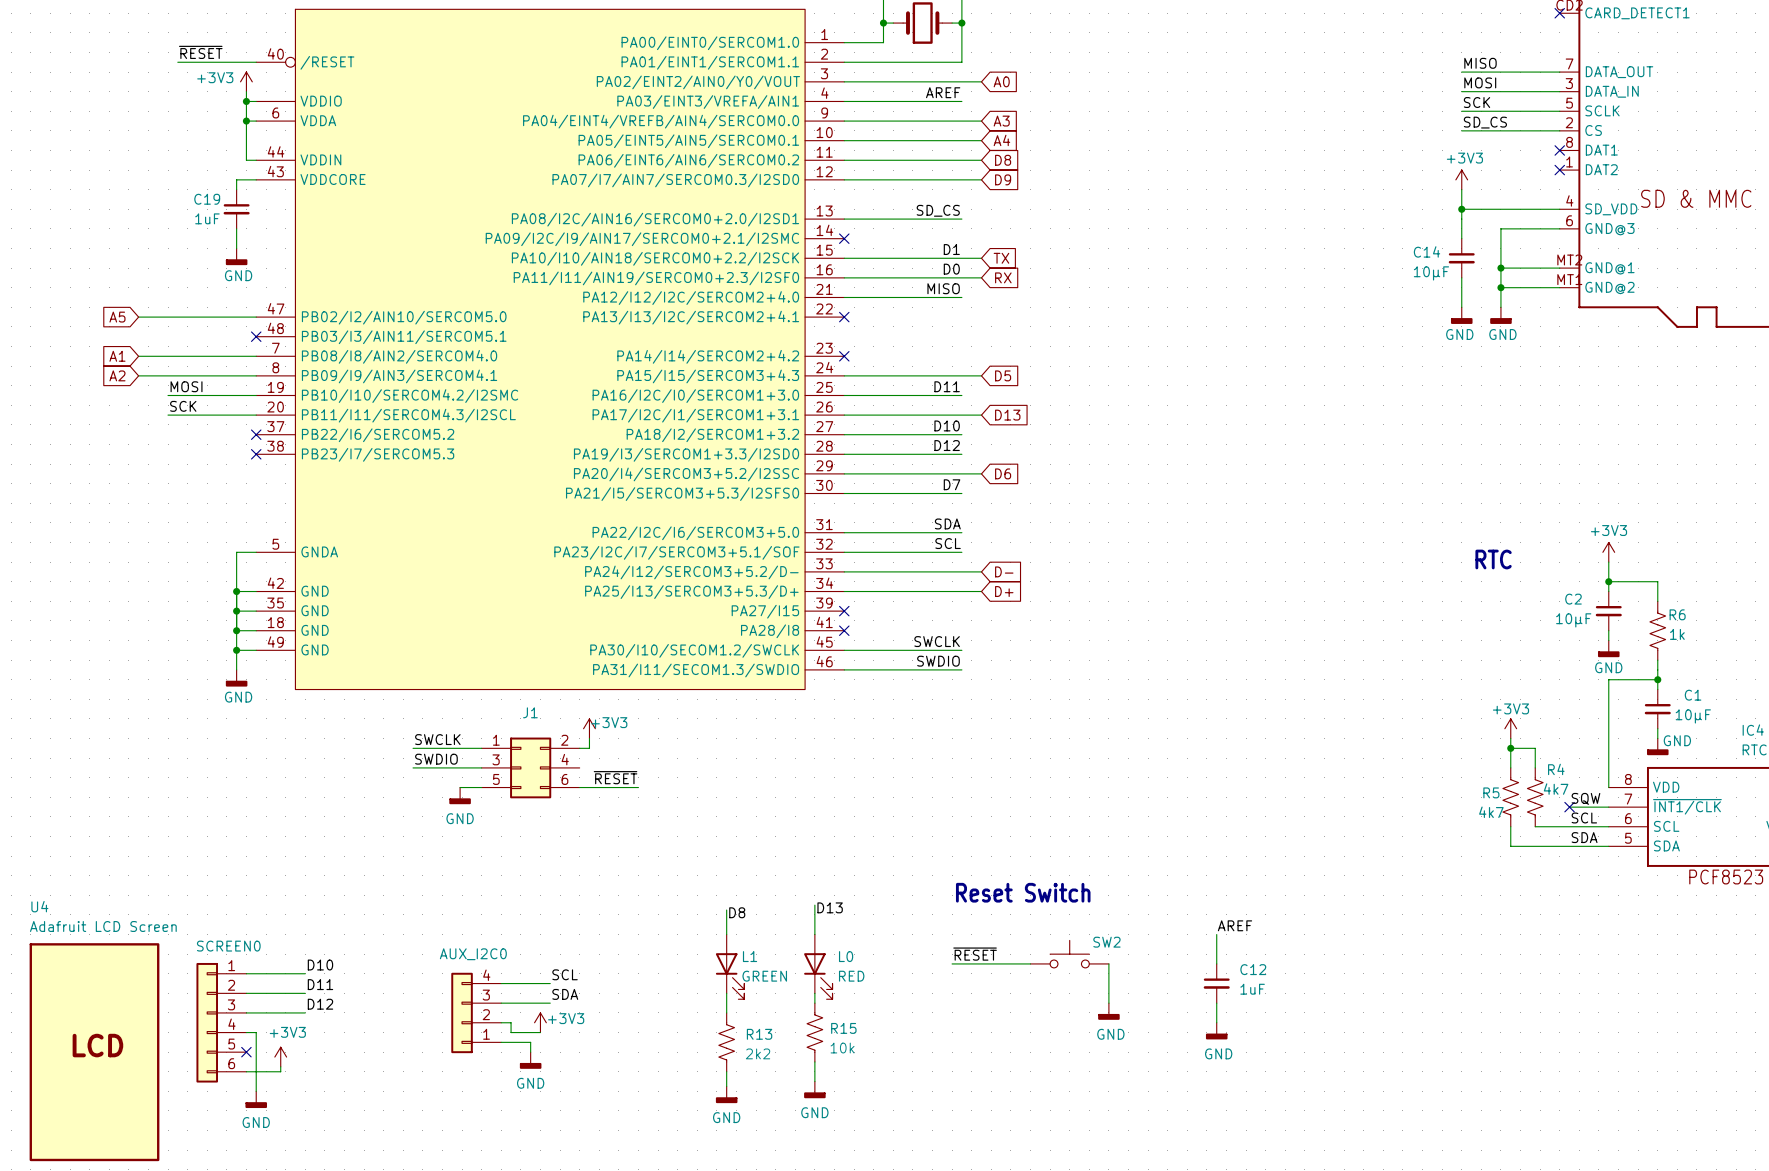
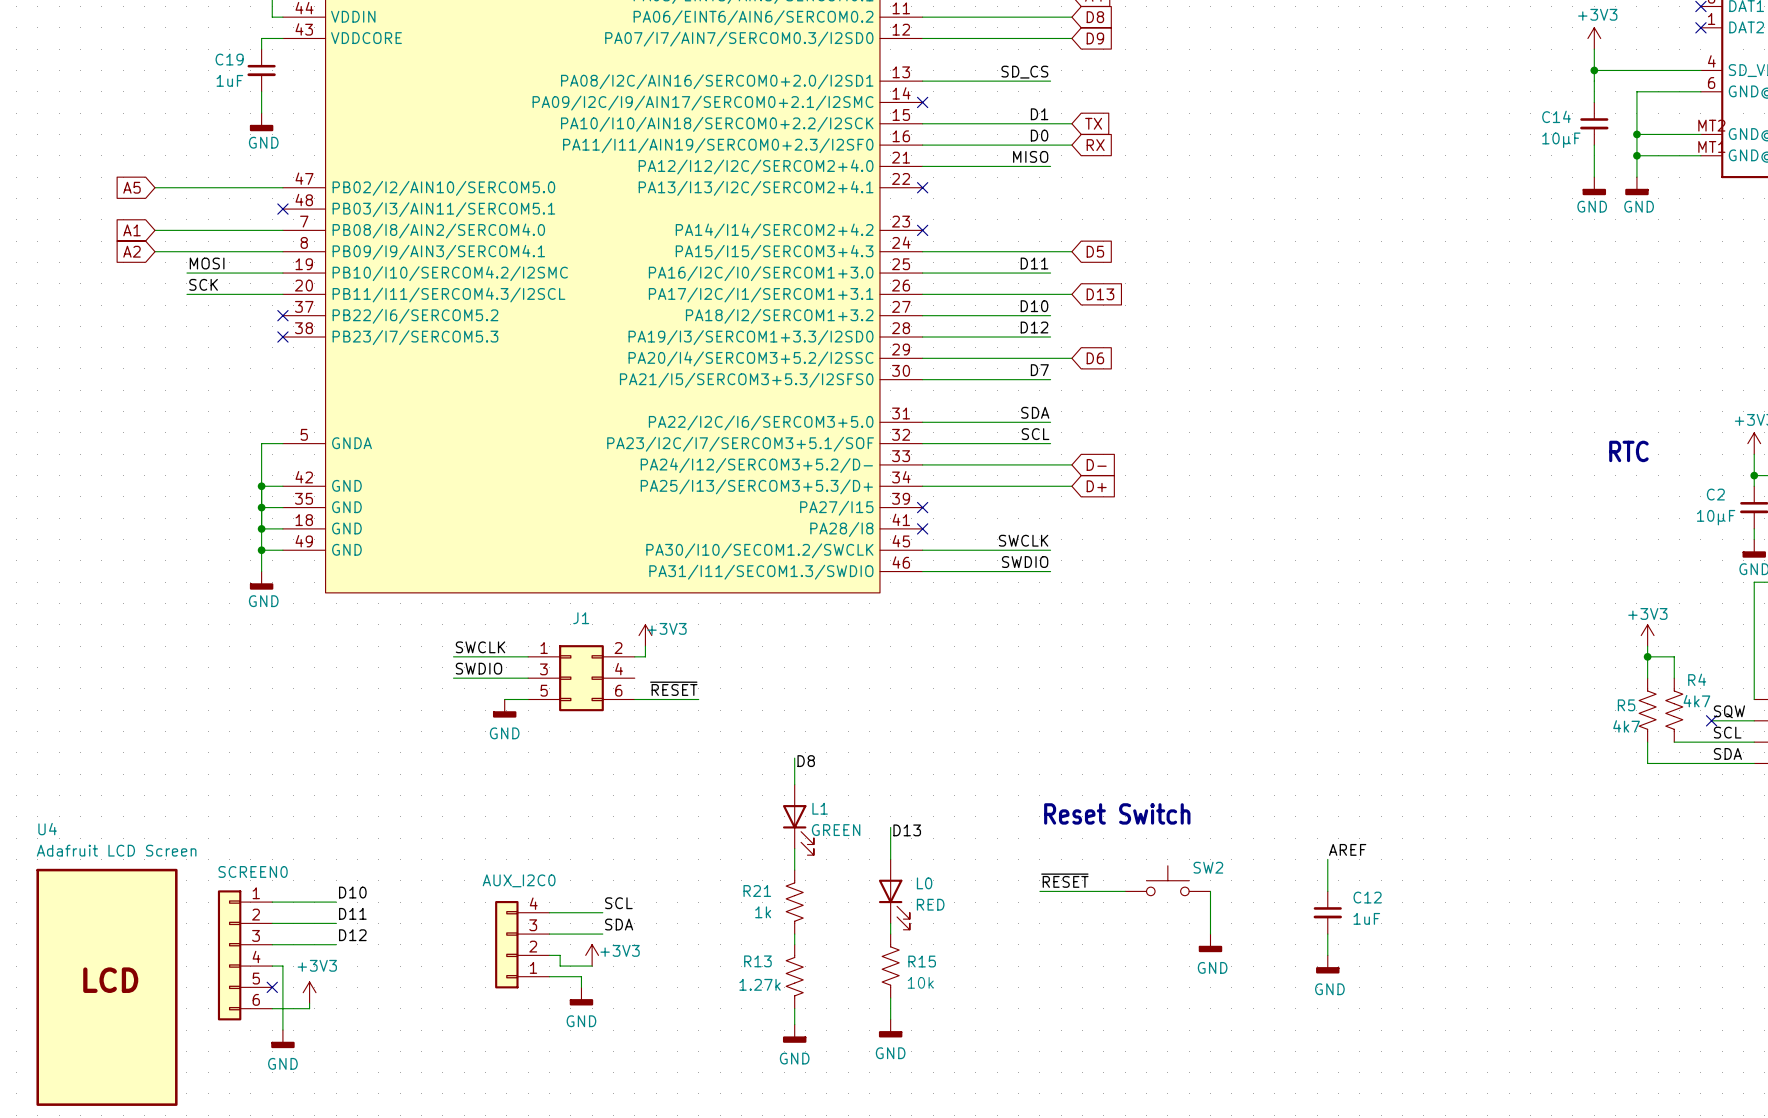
wire: none -> (794, 758) (794, 784)
label position: D8 (737, 912) -> D8 (806, 761)
L1 position: (730, 966) -> (798, 819)
R21: none -> 1k (794, 902)
R13 flip: as is (726, 1042) -> left-right (794, 976)
R13 value: 2k2 (758, 1053) -> 1.27k (760, 984)

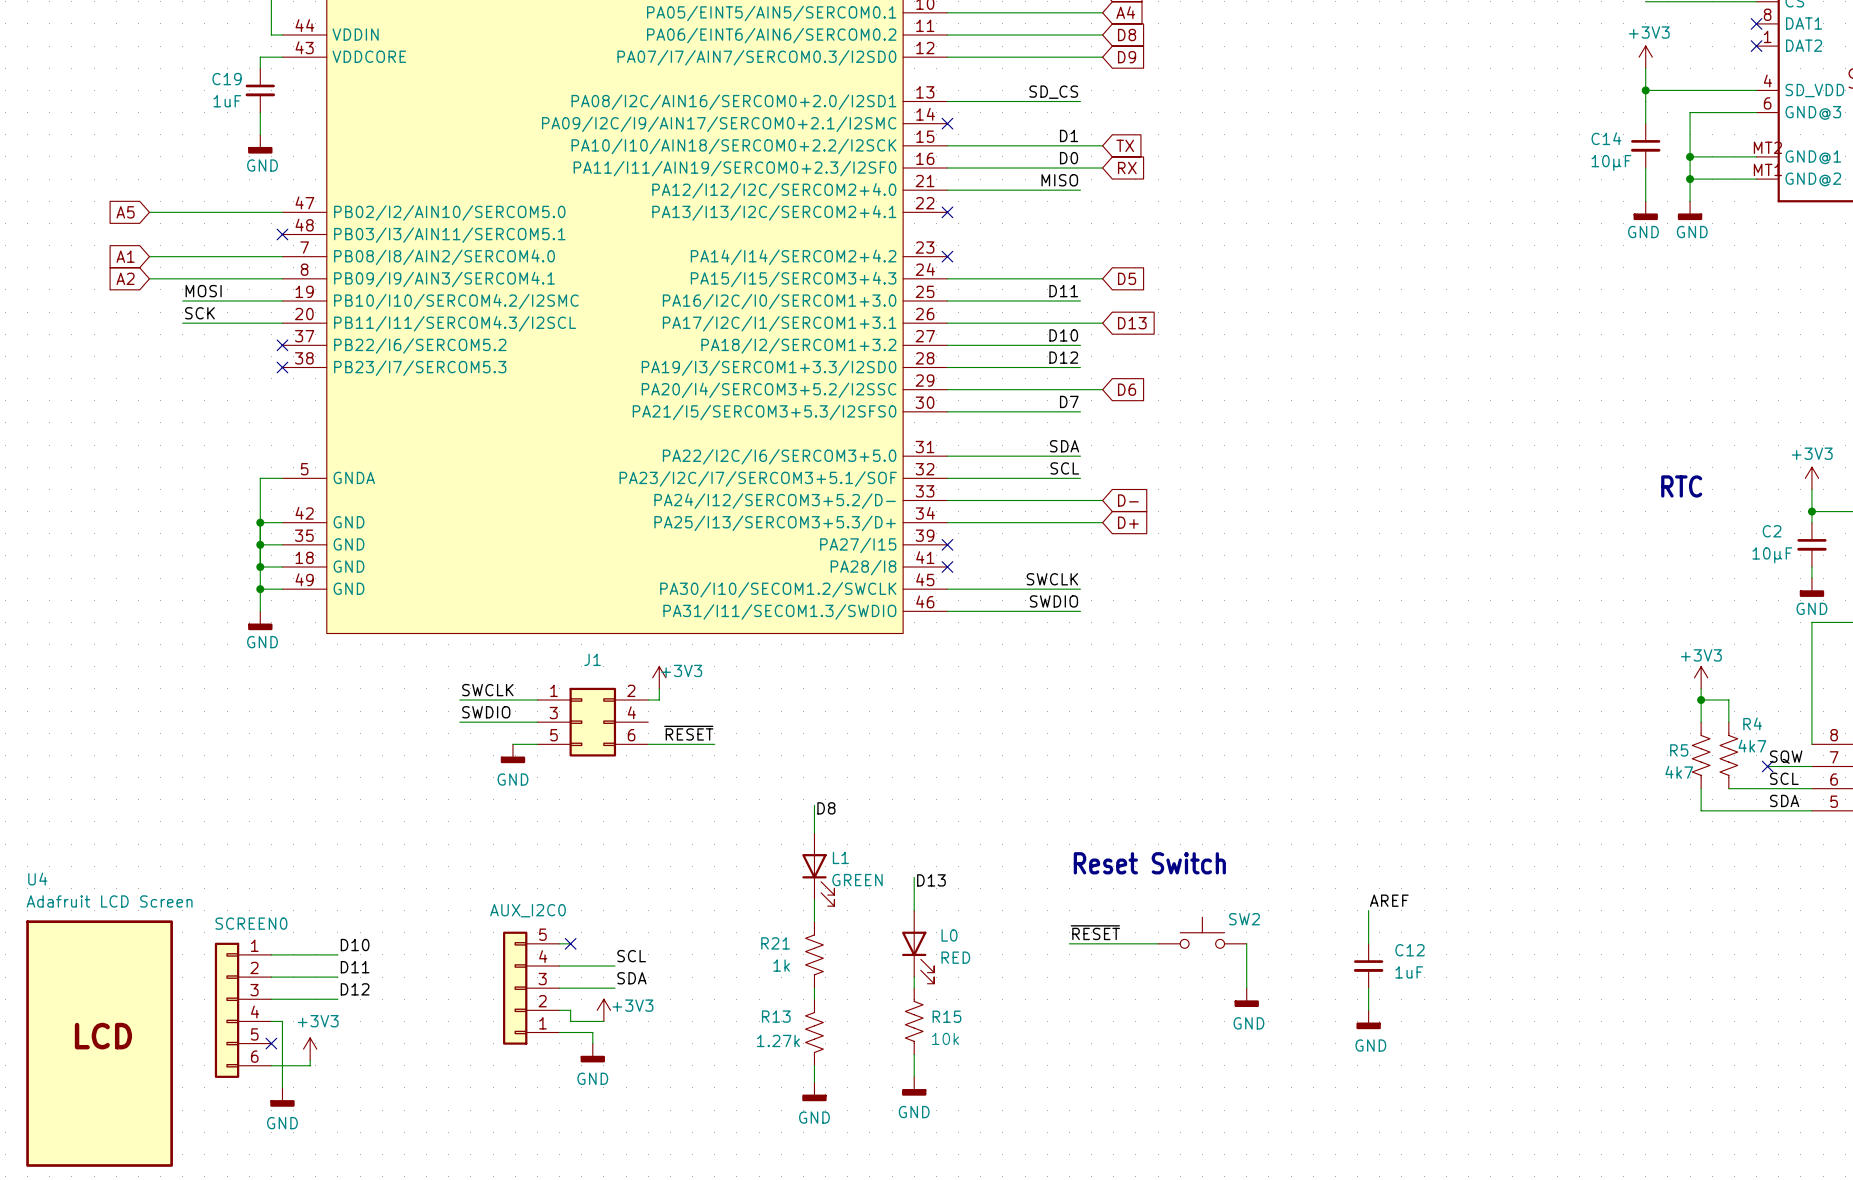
wire: none -> (559, 943) (570, 943)
no-connect mark: none -> (570, 943)
AUX_I2C0 symbol: [495, 901, 550, 989] -> [503, 931, 560, 1045]

